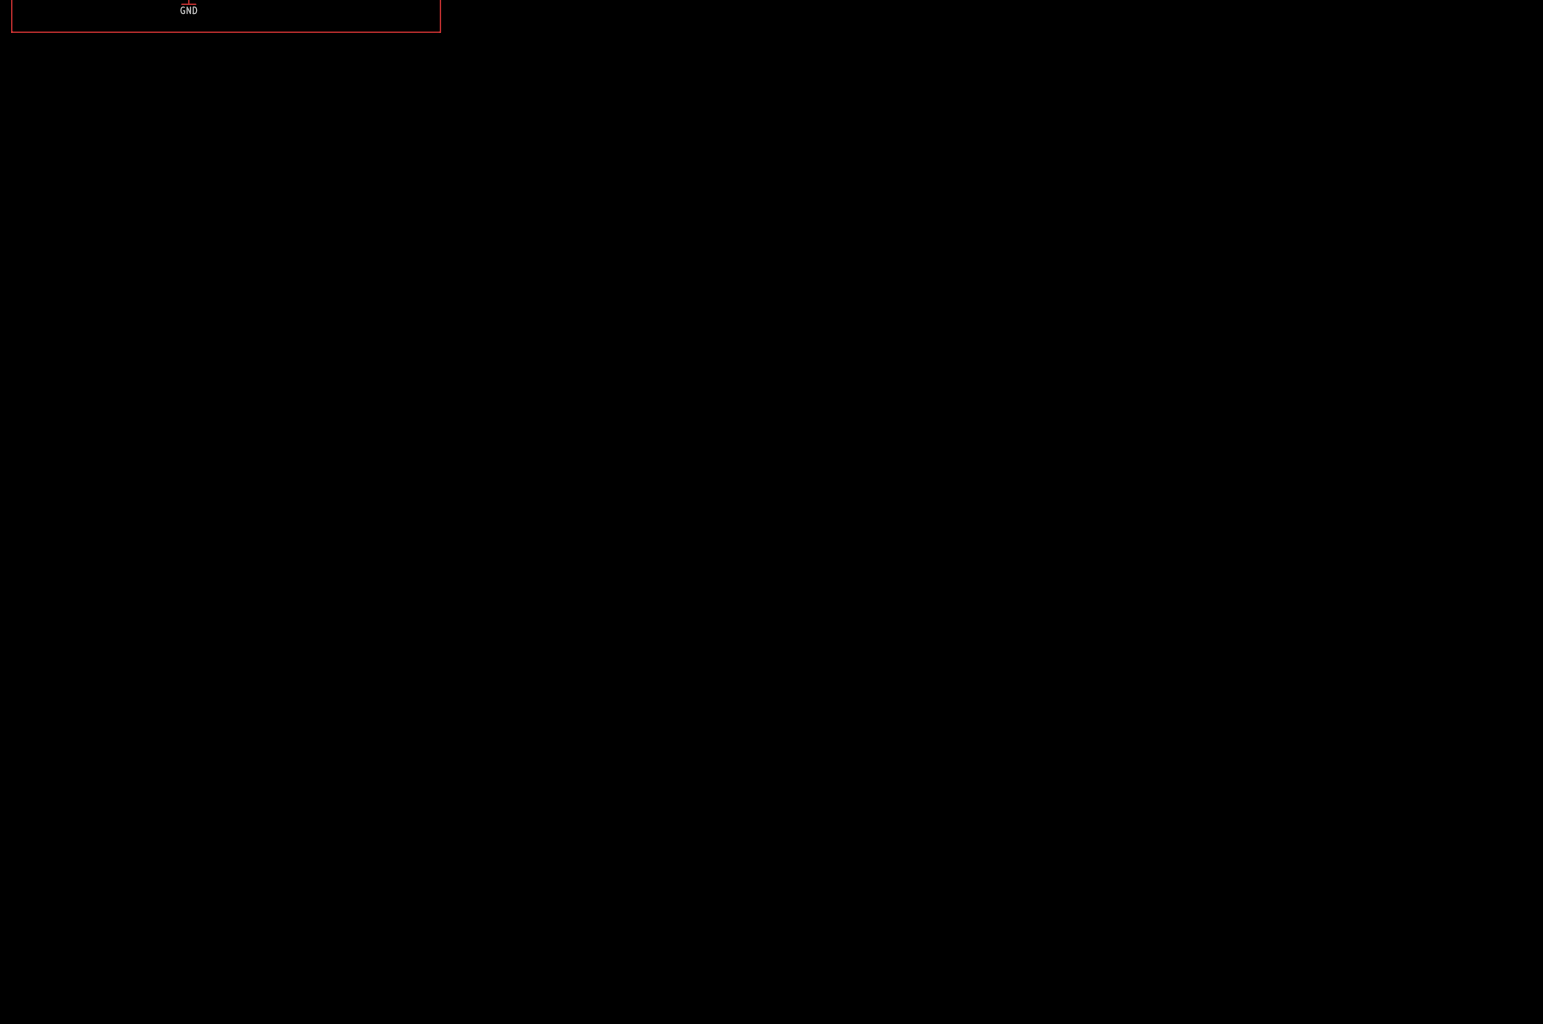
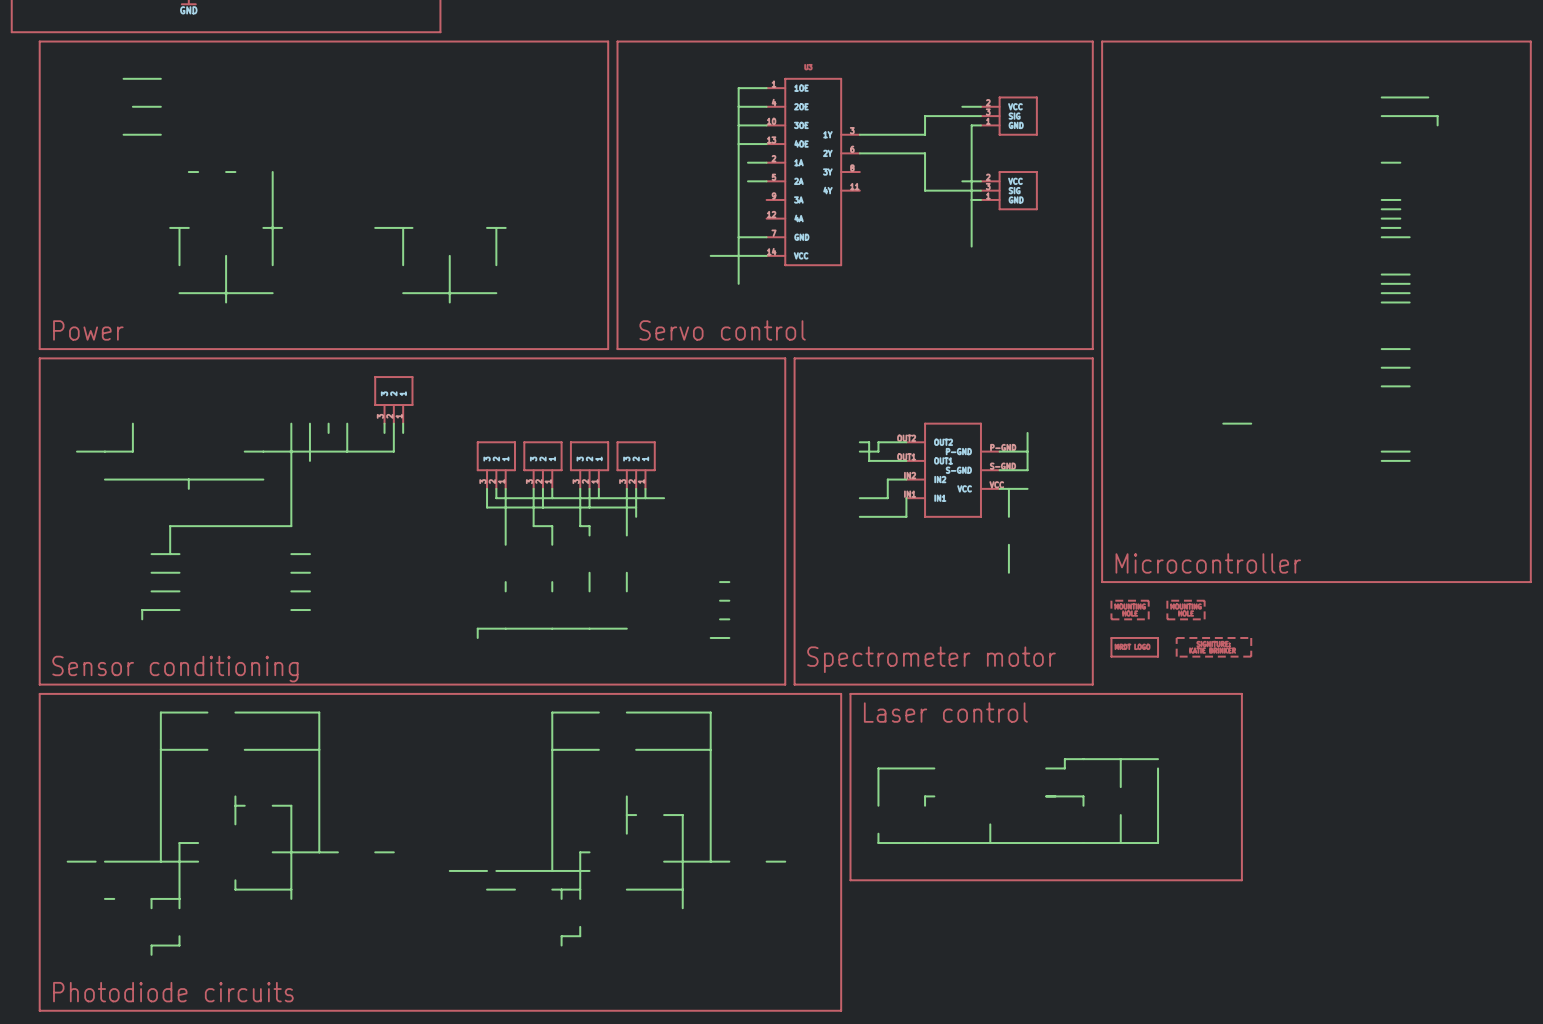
line: none -> (39, 41) (608, 41) (608, 349) (39, 349) (39, 41)
line: none -> (617, 41) (1092, 41) (1092, 349) (617, 349) (617, 41)
line: none -> (1102, 41) (1530, 41) (1530, 582) (1102, 582) (1102, 41)
wire: none -> (123, 78) (160, 78)
wire: none -> (766, 88) (738, 88) (738, 283)
wire: none -> (1381, 97) (1428, 97)
wire: none -> (132, 106) (160, 106)
wire: none -> (738, 106) (766, 106)
wire: none -> (962, 106) (980, 106)
wire: none -> (980, 116) (925, 116) (925, 134) (859, 134)
part: none -> (1009, 116)
wire: none -> (1381, 116) (1437, 116) (1437, 125)
wire: none -> (738, 125) (766, 125)
wire: none -> (980, 125) (971, 125) (971, 246)
wire: none -> (123, 134) (160, 134)
wire: none -> (738, 144) (766, 144)
wire: none -> (859, 153) (925, 153) (925, 190) (980, 190)
wire: none -> (747, 162) (766, 162)
wire: none -> (1381, 162) (1400, 162)
wire: none -> (188, 172) (198, 172)
wire: none -> (226, 172) (235, 172)
wire: none -> (272, 172) (272, 265)
part: none -> (813, 172)
wire: none -> (747, 181) (766, 181)
wire: none -> (962, 181) (980, 181)
part: none -> (1009, 190)
wire: none -> (971, 199) (980, 199)
wire: none -> (1381, 199) (1400, 199)
wire: none -> (1381, 209) (1400, 209)
wire: none -> (1381, 218) (1400, 218)
wire: none -> (170, 227) (188, 227)
wire: none -> (179, 227) (179, 265)
wire: none -> (263, 227) (282, 227)
wire: none -> (375, 227) (412, 227)
wire: none -> (403, 227) (403, 265)
wire: none -> (487, 227) (505, 227)
wire: none -> (496, 227) (496, 265)
wire: none -> (1381, 227) (1400, 227)
wire: none -> (738, 237) (766, 237)
wire: none -> (1381, 237) (1409, 237)
wire: none -> (226, 255) (226, 302)
wire: none -> (449, 255) (449, 302)
wire: none -> (710, 255) (766, 255)
wire: none -> (1381, 274) (1409, 274)
wire: none -> (1381, 283) (1409, 283)
wire: none -> (179, 293) (272, 293)
wire: none -> (403, 293) (496, 293)
wire: none -> (1381, 293) (1409, 293)
wire: none -> (1381, 302) (1409, 302)
text: none -> Power (88, 330)
text: none -> Servo control (722, 330)
wire: none -> (1381, 349) (1409, 349)
line: none -> (39, 358) (39, 684) (785, 684) (785, 358) (39, 358)
line: none -> (794, 358) (1092, 358) (1092, 684) (794, 684) (794, 358)
wire: none -> (1381, 367) (1409, 367)
wire: none -> (1381, 386) (1409, 386)
part: none -> (393, 400)
wire: none -> (132, 423) (132, 451) (76, 451)
wire: none -> (291, 423) (291, 526) (170, 526) (170, 554)
wire: none -> (309, 423) (309, 460)
wire: none -> (328, 423) (328, 432)
wire: none -> (347, 423) (347, 451)
wire: none -> (384, 423) (384, 432)
wire: none -> (393, 423) (393, 451) (244, 451)
wire: none -> (403, 423) (403, 432)
wire: none -> (1223, 423) (1251, 423)
wire: none -> (1027, 432) (1027, 470) (999, 470)
wire: none -> (859, 442) (869, 442) (869, 460) (906, 460)
wire: none -> (906, 442) (878, 442) (878, 451) (859, 451)
wire: none -> (999, 451) (1027, 451)
wire: none -> (1381, 451) (1409, 451)
wire: none -> (1381, 460) (1409, 460)
part: none -> (496, 465)
part: none -> (542, 465)
part: none -> (589, 465)
part: none -> (636, 465)
part: none -> (953, 470)
wire: none -> (104, 479) (263, 479)
wire: none -> (188, 479) (188, 488)
wire: none -> (906, 479) (887, 479) (887, 498) (859, 498)
wire: none -> (487, 488) (487, 507) (636, 507)
wire: none -> (496, 488) (496, 498) (664, 498)
wire: none -> (505, 488) (505, 544)
wire: none -> (533, 488) (533, 526) (552, 526) (552, 544)
wire: none -> (542, 488) (542, 507)
wire: none -> (552, 488) (552, 498)
wire: none -> (580, 488) (580, 526) (589, 526) (589, 535)
wire: none -> (589, 488) (589, 507)
wire: none -> (598, 488) (598, 498)
wire: none -> (626, 488) (626, 535)
wire: none -> (636, 488) (636, 516)
wire: none -> (645, 488) (645, 498)
wire: none -> (999, 488) (1027, 488)
wire: none -> (1008, 488) (1008, 516)
wire: none -> (906, 498) (906, 516) (859, 516)
wire: none -> (1008, 544) (1008, 572)
wire: none -> (151, 554) (179, 554)
wire: none -> (291, 554) (309, 554)
text: none -> Microcontroller (1208, 563)
wire: none -> (151, 572) (179, 572)
wire: none -> (291, 572) (309, 572)
wire: none -> (589, 572) (589, 591)
wire: none -> (626, 572) (626, 591)
wire: none -> (505, 582) (505, 591)
wire: none -> (552, 582) (552, 591)
wire: none -> (720, 582) (729, 582)
wire: none -> (151, 591) (179, 591)
wire: none -> (291, 591) (309, 591)
wire: none -> (720, 600) (729, 600)
wire: none -> (179, 610) (142, 610) (142, 619)
wire: none -> (291, 610) (309, 610)
part: none -> (1130, 610)
part: none -> (1185, 610)
wire: none -> (720, 619) (729, 619)
wire: none -> (626, 628) (477, 628) (477, 637)
wire: none -> (710, 637) (729, 637)
part: none -> (1134, 647)
part: none -> (1213, 647)
text: none -> Spectrometer motor (931, 659)
text: none -> Sensor conditioning (175, 669)
line: none -> (39, 693) (39, 1010) (841, 1010) (841, 693) (39, 693)
line: none -> (850, 693) (1241, 693) (1241, 880) (850, 880) (850, 693)
wire: none -> (207, 712) (160, 712) (160, 861)
wire: none -> (235, 712) (319, 712) (319, 852)
wire: none -> (598, 712) (552, 712) (552, 870)
wire: none -> (626, 712) (710, 712) (710, 861)
text: none -> Laser control (945, 712)
wire: none -> (160, 749) (207, 749)
wire: none -> (244, 749) (319, 749)
wire: none -> (552, 749) (598, 749)
wire: none -> (636, 749) (710, 749)
wire: none -> (1120, 759) (1120, 787)
wire: none -> (1158, 759) (1064, 759) (1064, 768) (1046, 768)
wire: none -> (934, 768) (878, 768) (878, 805)
wire: none -> (1158, 768) (1158, 843) (878, 843) (878, 833)
wire: none -> (235, 796) (235, 824)
wire: none -> (626, 796) (626, 833)
wire: none -> (934, 796) (925, 796) (925, 805)
wire: none -> (1046, 796) (1083, 796) (1083, 805)
wire: none -> (235, 805) (244, 805)
wire: none -> (272, 805) (291, 805) (291, 898)
wire: none -> (626, 815) (636, 815)
wire: none -> (664, 815) (682, 815) (682, 908)
wire: none -> (1120, 815) (1120, 843)
wire: none -> (990, 824) (990, 843)
wire: none -> (198, 843) (179, 843) (179, 908)
wire: none -> (272, 852) (337, 852)
wire: none -> (375, 852) (393, 852)
wire: none -> (589, 852) (580, 852) (580, 898)
wire: none -> (67, 861) (95, 861)
wire: none -> (104, 861) (198, 861)
wire: none -> (664, 861) (729, 861)
wire: none -> (766, 861) (785, 861)
wire: none -> (449, 870) (487, 870)
wire: none -> (496, 870) (589, 870)
wire: none -> (235, 880) (235, 889) (291, 889)
wire: none -> (487, 889) (514, 889)
wire: none -> (552, 889) (580, 889)
wire: none -> (561, 889) (561, 898)
wire: none -> (626, 889) (682, 889)
wire: none -> (104, 898) (114, 898)
wire: none -> (179, 898) (151, 898) (151, 908)
wire: none -> (580, 926) (580, 936) (561, 936) (561, 945)
wire: none -> (179, 936) (179, 945) (151, 945) (151, 954)
text: none -> Photodiode circuits (173, 992)

